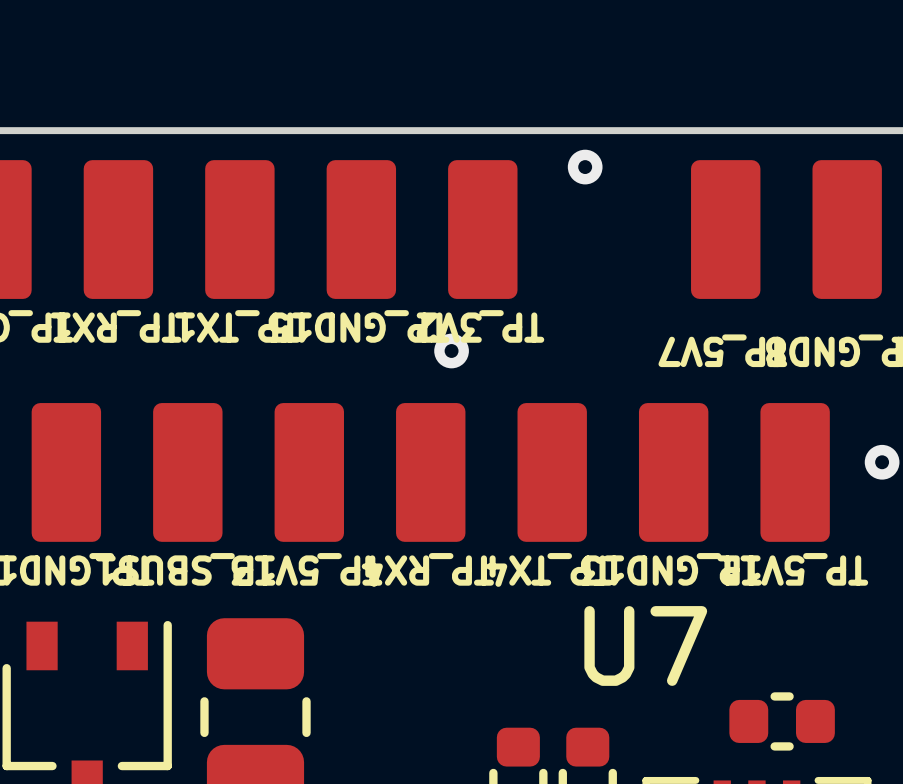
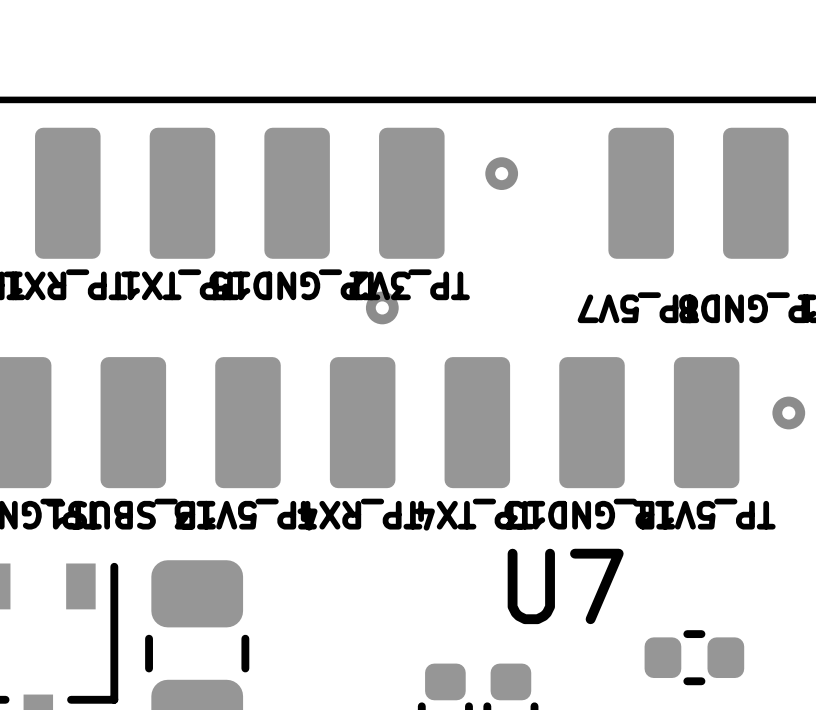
via position: (585, 167) -> (501, 173)

